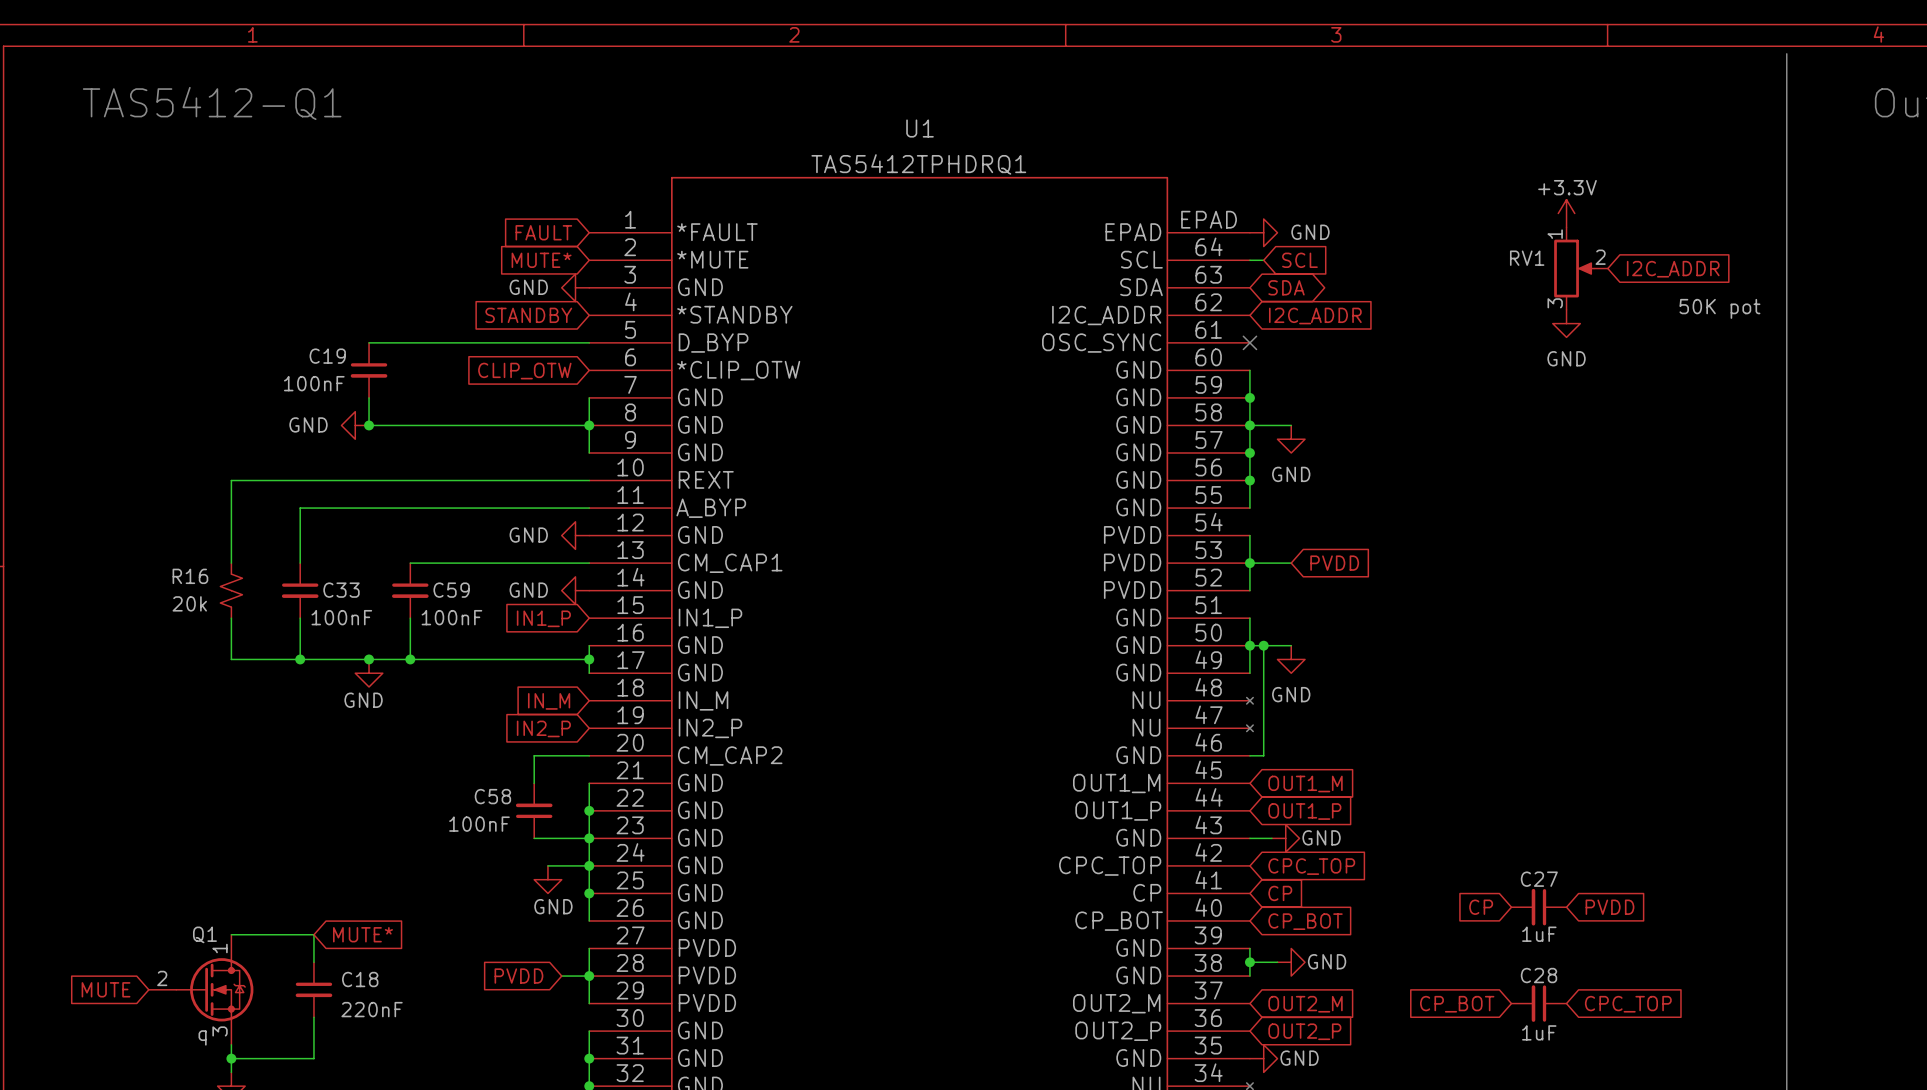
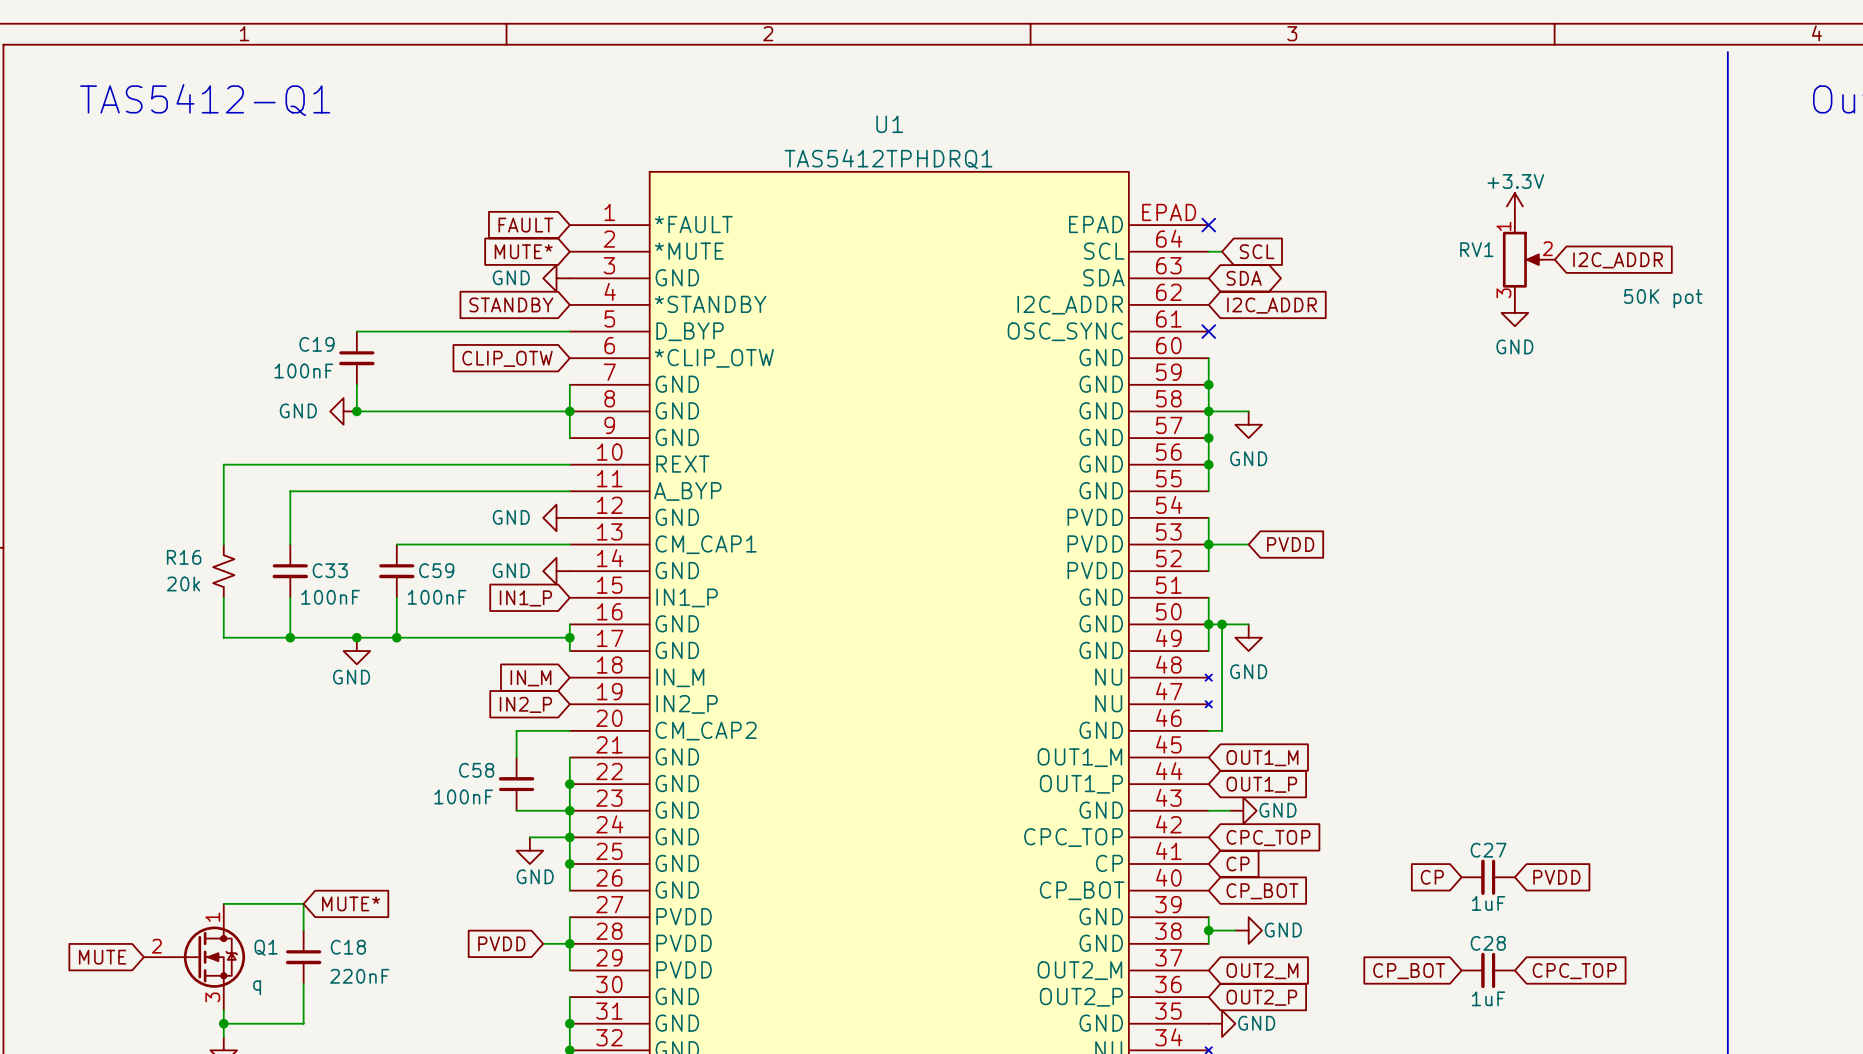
no-connect mark: none -> (1208, 225)
power symbol: GND (1263, 232) -> none
Q1 name position: Q1 (204, 934) -> Q1 (266, 947)
Q1 value position: q (202, 1037) -> q (257, 987)

